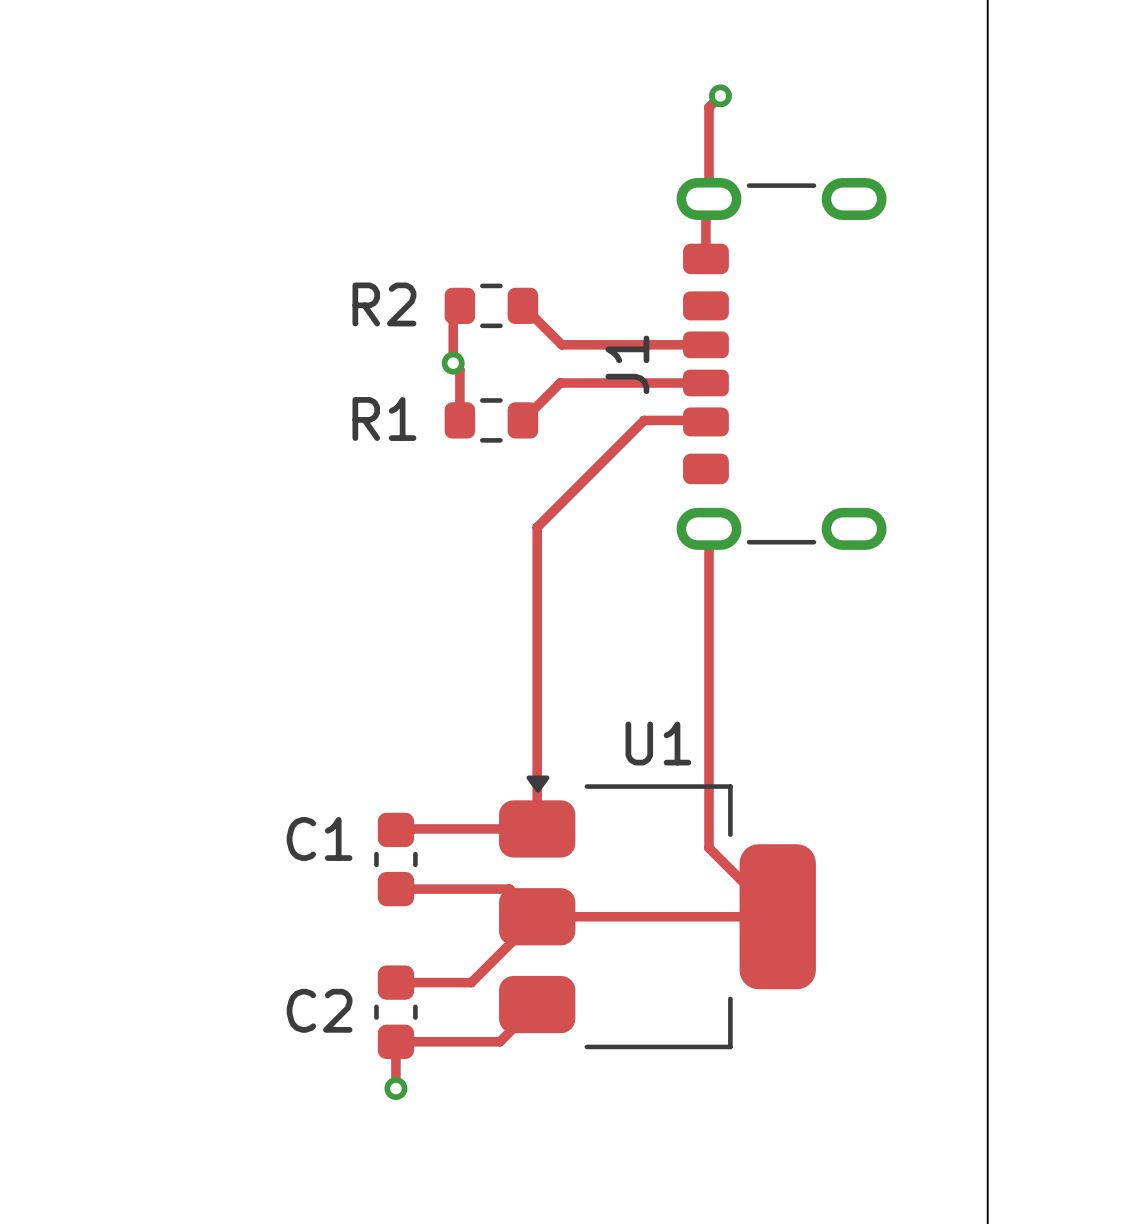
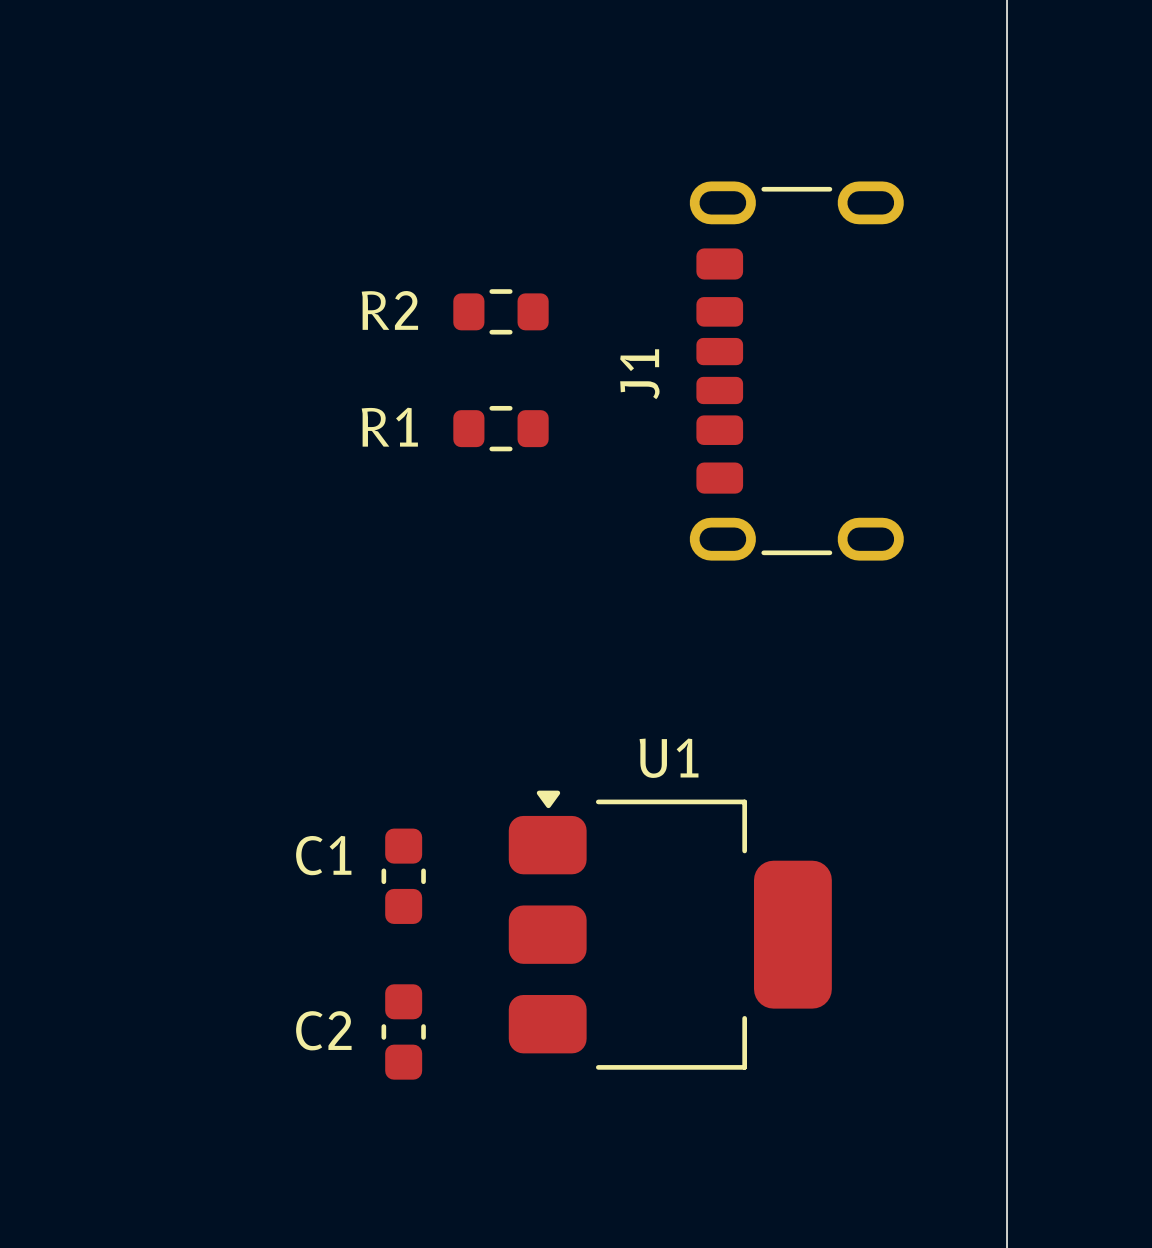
track: (720, 95) (709, 107) (709, 198) (705, 202) (705, 258) -> none
via: (720, 95) -> none
track: (459, 305) (453, 312) (453, 363) (459, 369) (459, 420) -> none
track: (522, 305) (561, 344) (705, 344) -> none
via: (453, 363) -> none
track: (705, 383) (560, 383) (522, 420) -> none
track: (705, 421) (644, 420) (537, 527) (537, 828) (395, 829) -> none
track: (709, 528) (709, 848) (777, 916) (537, 916) -> none
track: (395, 889) (509, 889) (537, 916) -> none
track: (537, 916) (471, 982) (395, 982) -> none
track: (537, 1004) (499, 1041) (395, 1041) (395, 1088) -> none
via: (395, 1088) -> none

